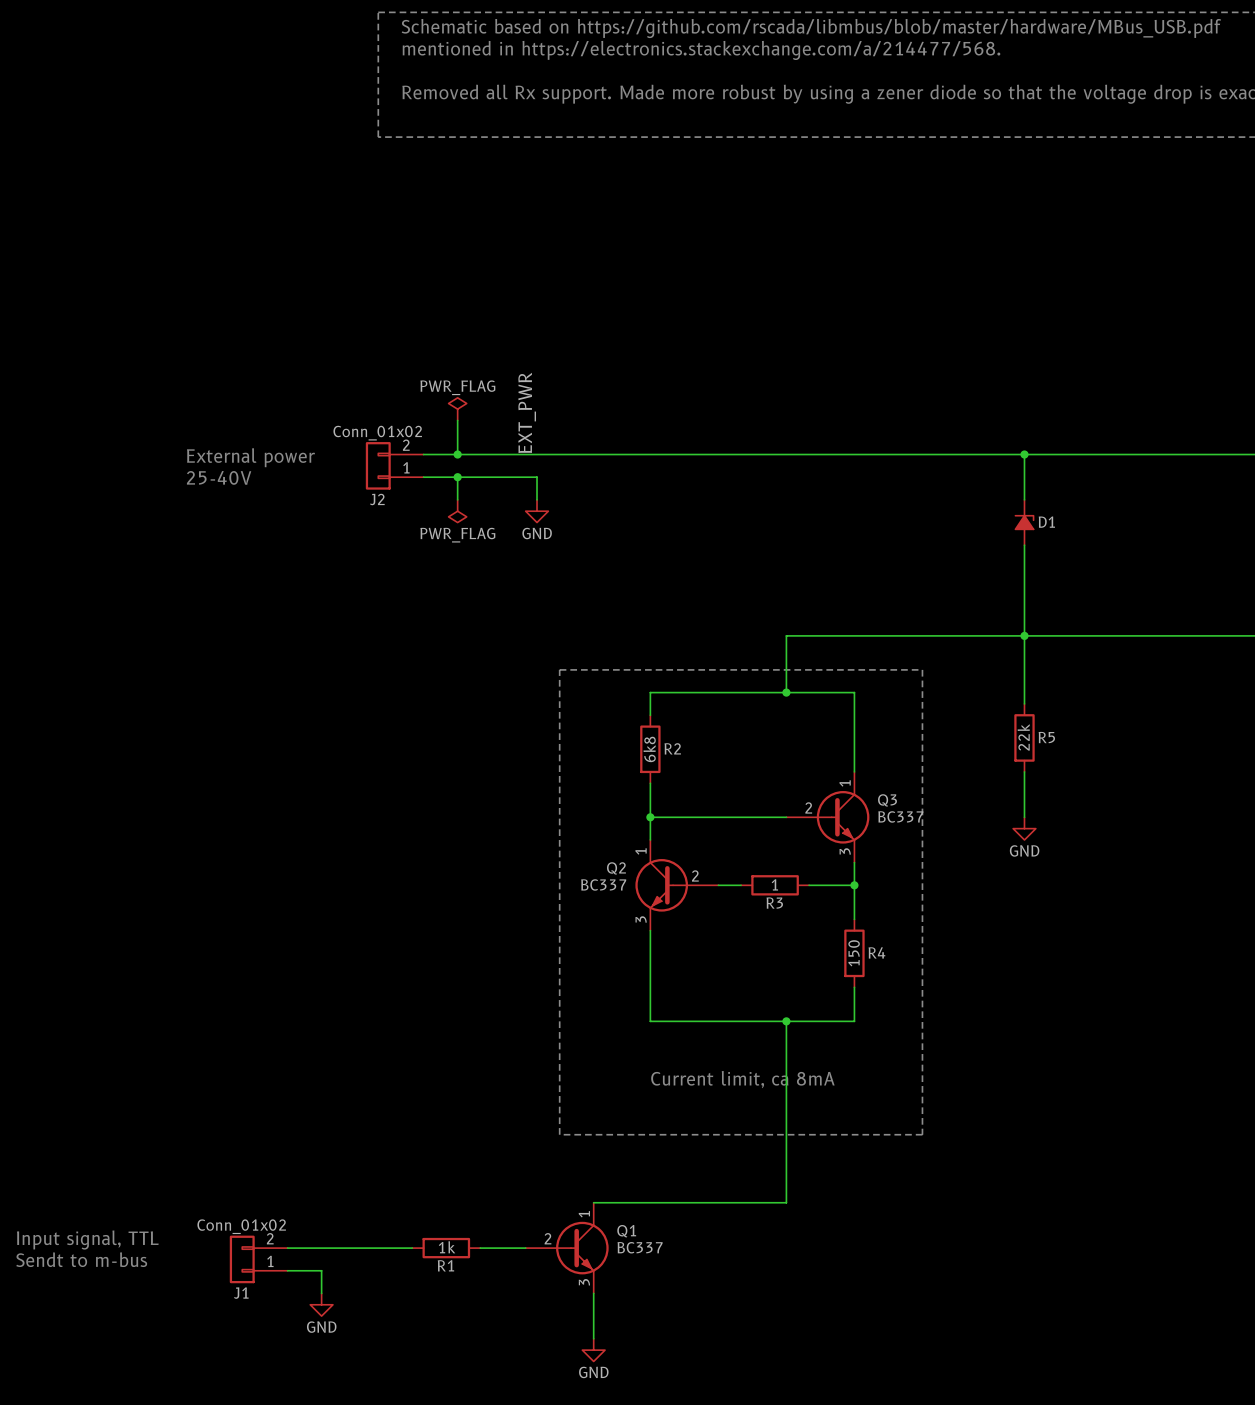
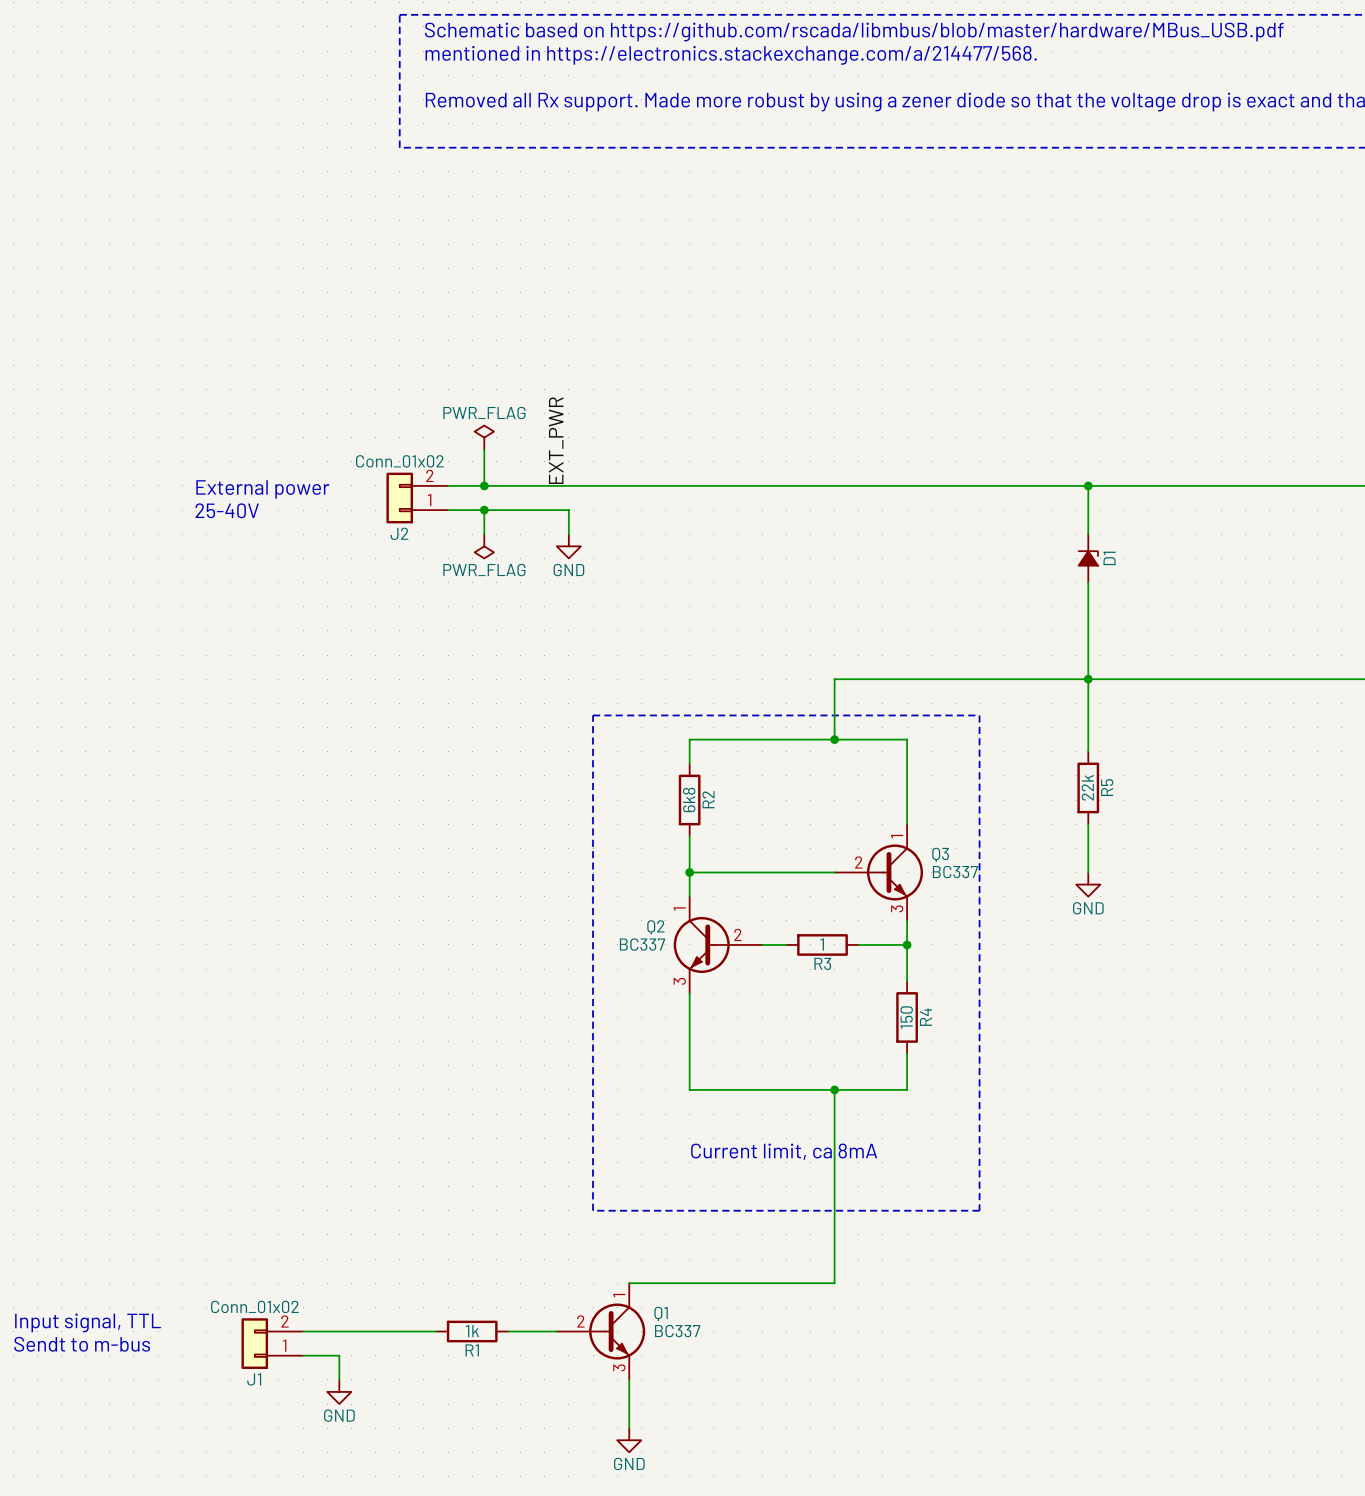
D1 name rotation: 0° (1046, 522) -> 90° counterclockwise (1109, 558)
R5 name rotation: 0° (1046, 737) -> 90° counterclockwise (1107, 787)
R2 name rotation: 0° (672, 748) -> 90° counterclockwise (708, 799)
R4 name rotation: 0° (876, 952) -> 90° counterclockwise (925, 1017)

